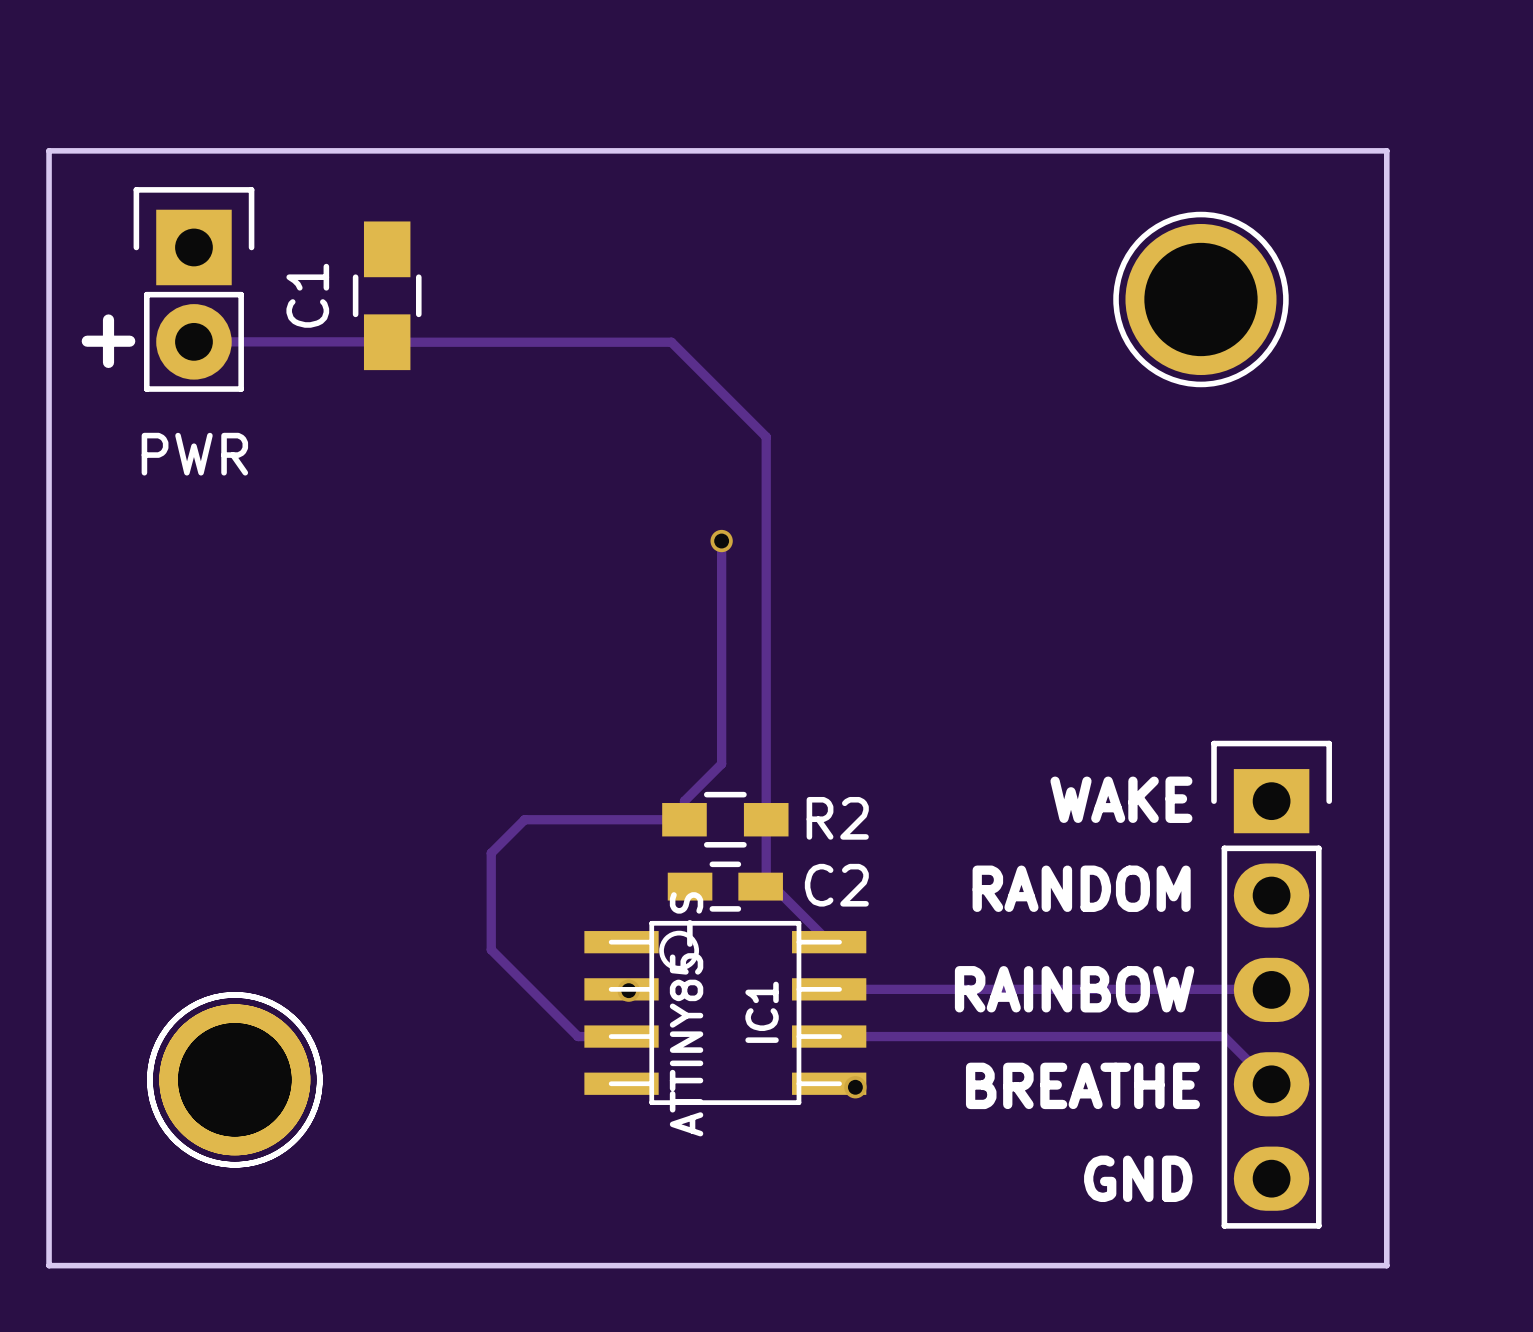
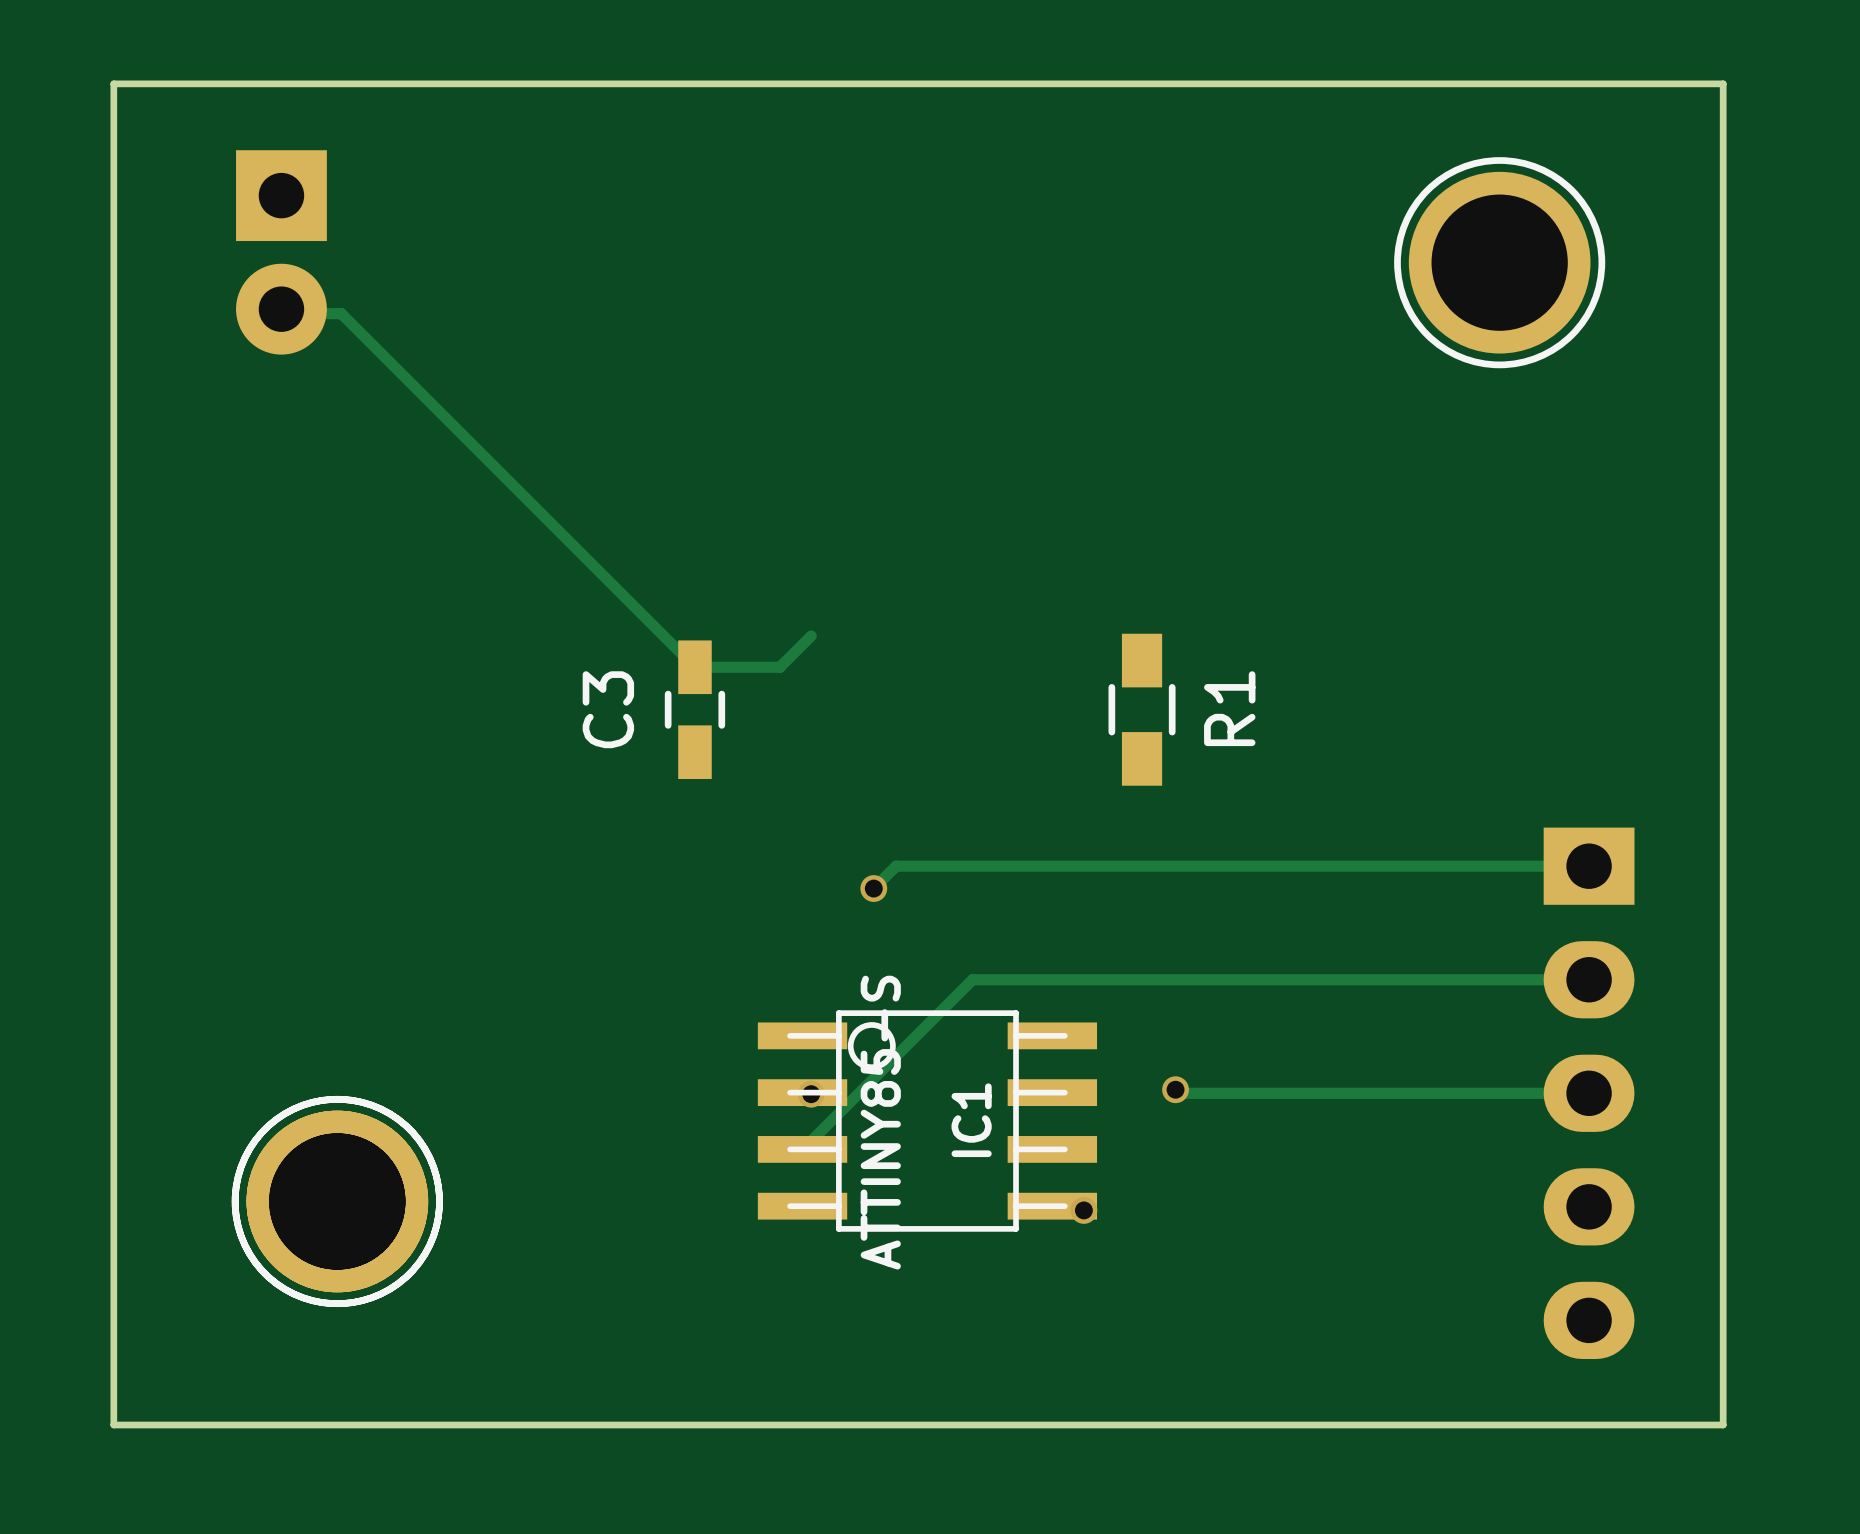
PWR side: top (193, 289) -> bottom (281, 252)
C1: (387, 295) -> none
text: + (108, 341) -> none
track: (238, 341) (386, 341) -> (341, 313) (694, 667) (779, 667) (811, 635)
track: (387, 342) (671, 342) (766, 436) (766, 881) -> none
track: (721, 541) (721, 763) (684, 801) (684, 819) (524, 819) (491, 853) (491, 949) (578, 1036) (621, 1036) -> none
via: (721, 541) -> none
C3: none -> (694, 709)
R1: none -> (1142, 709)
text: WAKE (1121, 799) -> none
track: none -> (1584, 866) (896, 866) (873, 888)
via: none -> (873, 888)
R2: (725, 819) -> none
C2: (725, 886) -> none
track: (760, 886) (773, 886) (829, 942) -> none
text: RANDOM (1081, 888) -> none
track: none -> (1584, 979) (972, 979) (806, 1145)
part side: top (1271, 984) -> bottom (1589, 1093)
via: none -> (1175, 1089)
track: (829, 989) (1271, 989) -> (1175, 1089) (1179, 1093) (1584, 1093)
text: RAINBOW (1074, 989) -> none
track: (829, 1036) (1223, 1036) (1271, 1084) -> none
text: BREATHE (1082, 1085) -> none
text: GND (1138, 1178) -> none

